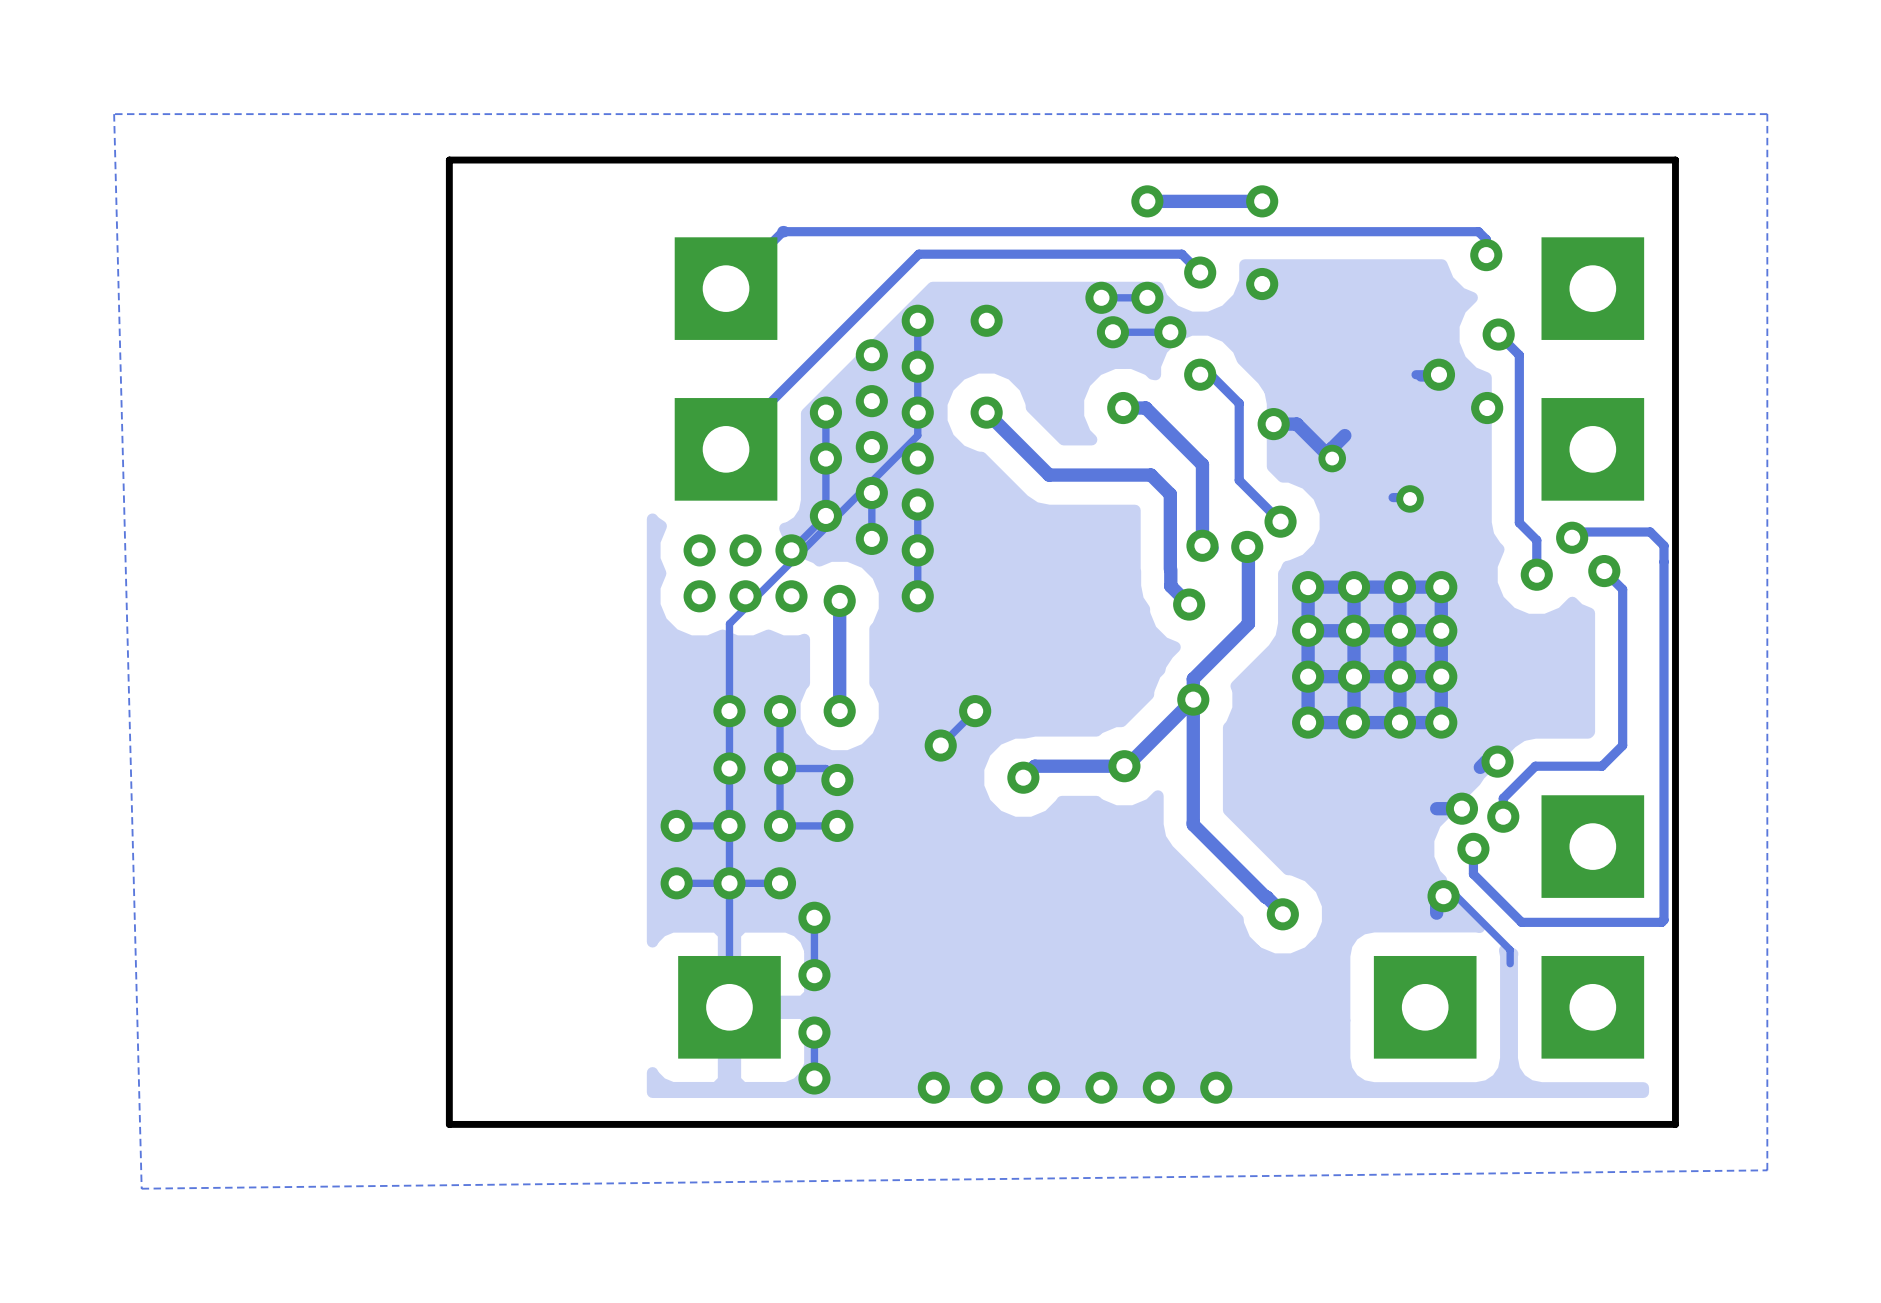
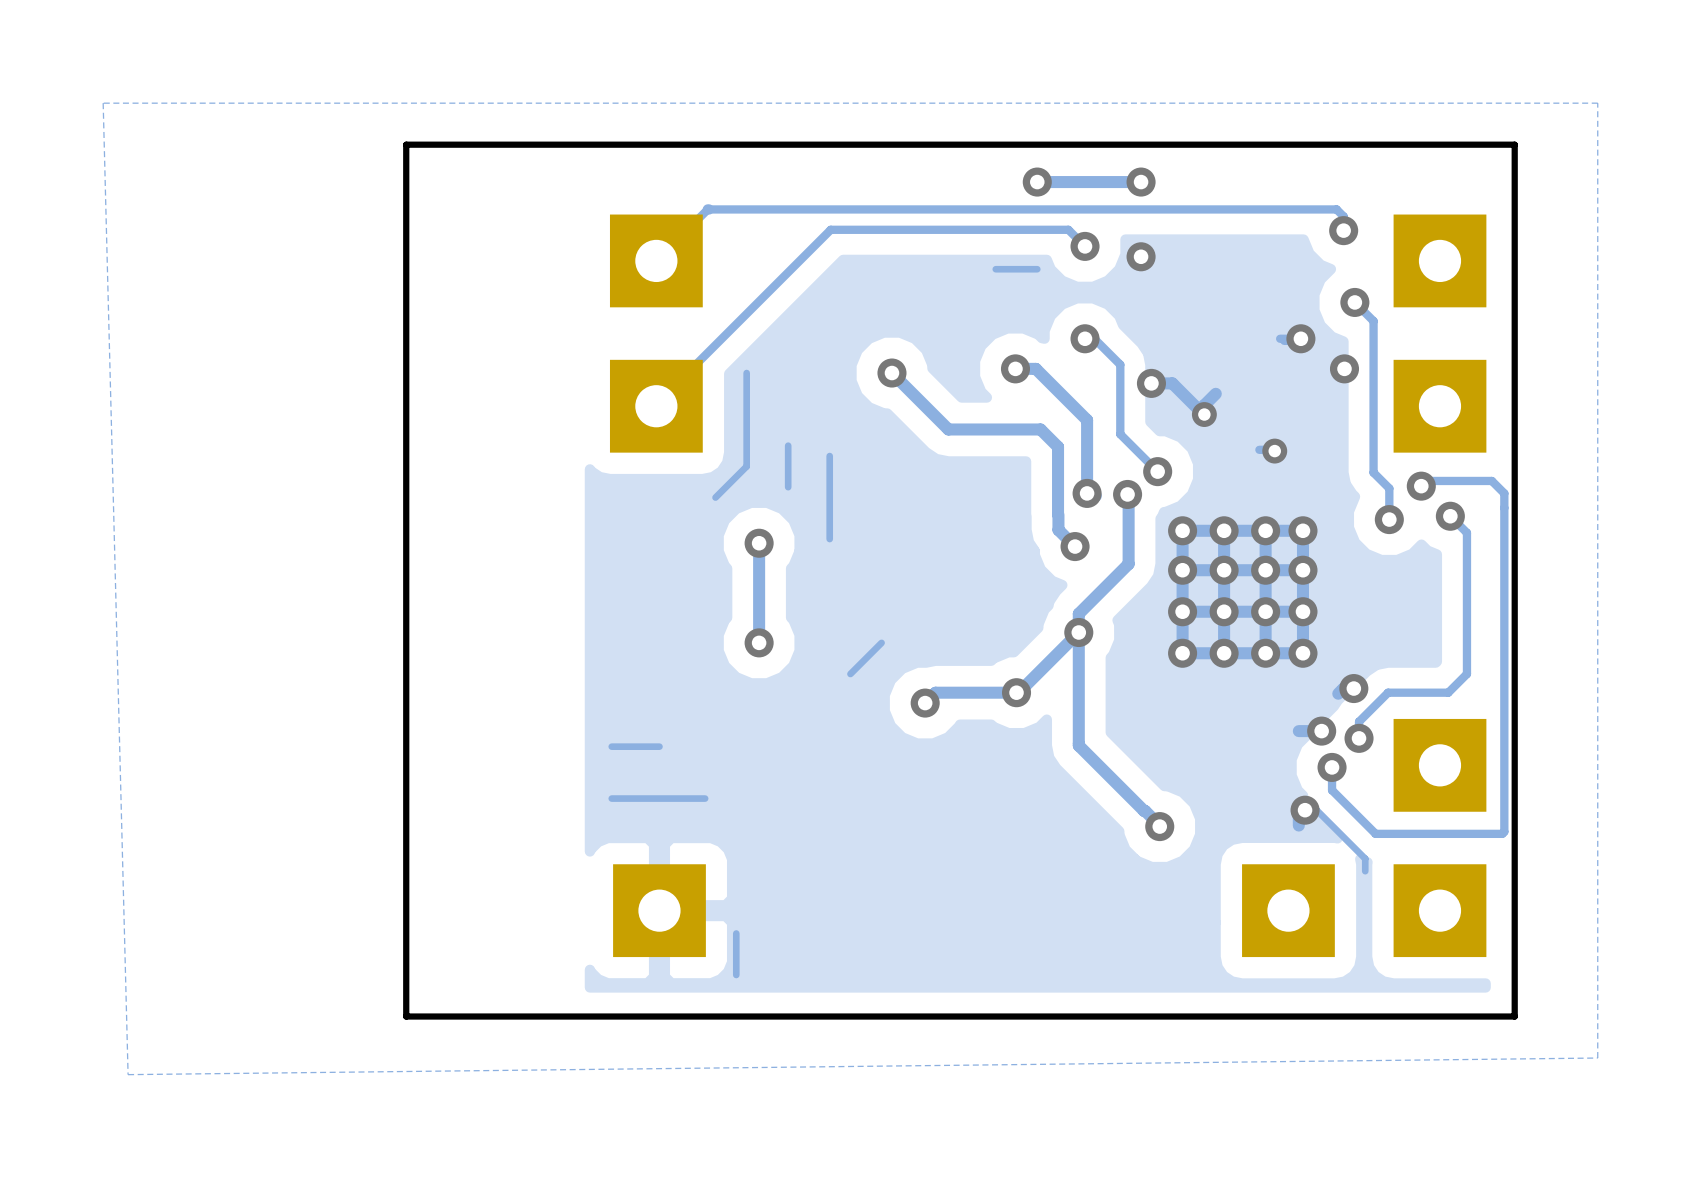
via: (1101, 297) -> none
via: (1147, 297) -> none
track: (917, 320) (917, 435) (729, 623) (729, 1007) -> none
via: (917, 320) -> none
via: (986, 320) -> none
via: (1112, 332) -> none
track: (1170, 332) (1112, 332) -> none
via: (1170, 332) -> none
via: (871, 355) -> none
via: (917, 366) -> none
via: (871, 401) -> none
via: (825, 412) -> none
via: (917, 412) -> none
via: (871, 447) -> none
via: (825, 458) -> none
via: (917, 458) -> none
via: (871, 492) -> none
via: (917, 504) -> none
via: (825, 515) -> none
via: (871, 538) -> none
via: (699, 550) -> none
via: (745, 550) -> none
via: (791, 550) -> none
via: (917, 550) -> none
via: (699, 596) -> none
via: (745, 596) -> none
via: (791, 596) -> none
via: (917, 596) -> none
via: (729, 711) -> none
track: (779, 711) (779, 757) -> none
via: (779, 711) -> none
via: (975, 711) -> none
via: (940, 745) -> none
via: (729, 768) -> none
via: (779, 768) -> none
track: (837, 779) (825, 768) (779, 768) (779, 825) (837, 825) -> none
via: (837, 779) -> none
via: (676, 825) -> none
via: (729, 825) -> none
via: (779, 825) -> none
via: (837, 825) -> none
via: (676, 883) -> none
via: (729, 883) -> none
via: (779, 883) -> none
track: (814, 917) (814, 975) -> none
via: (814, 917) -> none
via: (814, 975) -> none
via: (814, 1032) -> none
via: (814, 1078) -> none
via: (933, 1087) -> none
via: (986, 1087) -> none
via: (1044, 1087) -> none
via: (1101, 1087) -> none
via: (1158, 1087) -> none
via: (1216, 1087) -> none

